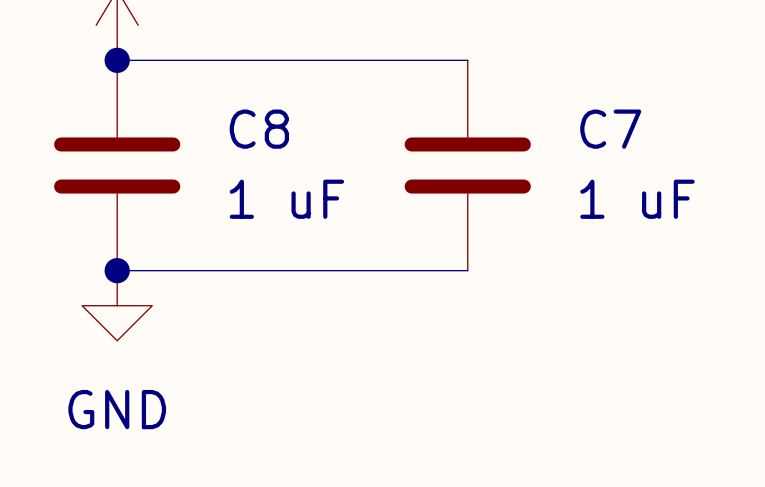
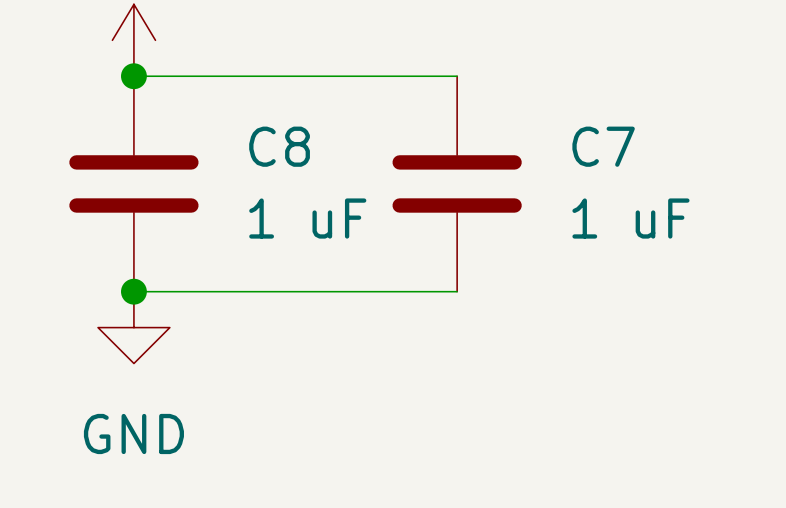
wire: (432, 60) (467, 60) -> none
C7 position: (467, 165) -> (457, 183)
wire: (432, 270) (467, 270) -> none

